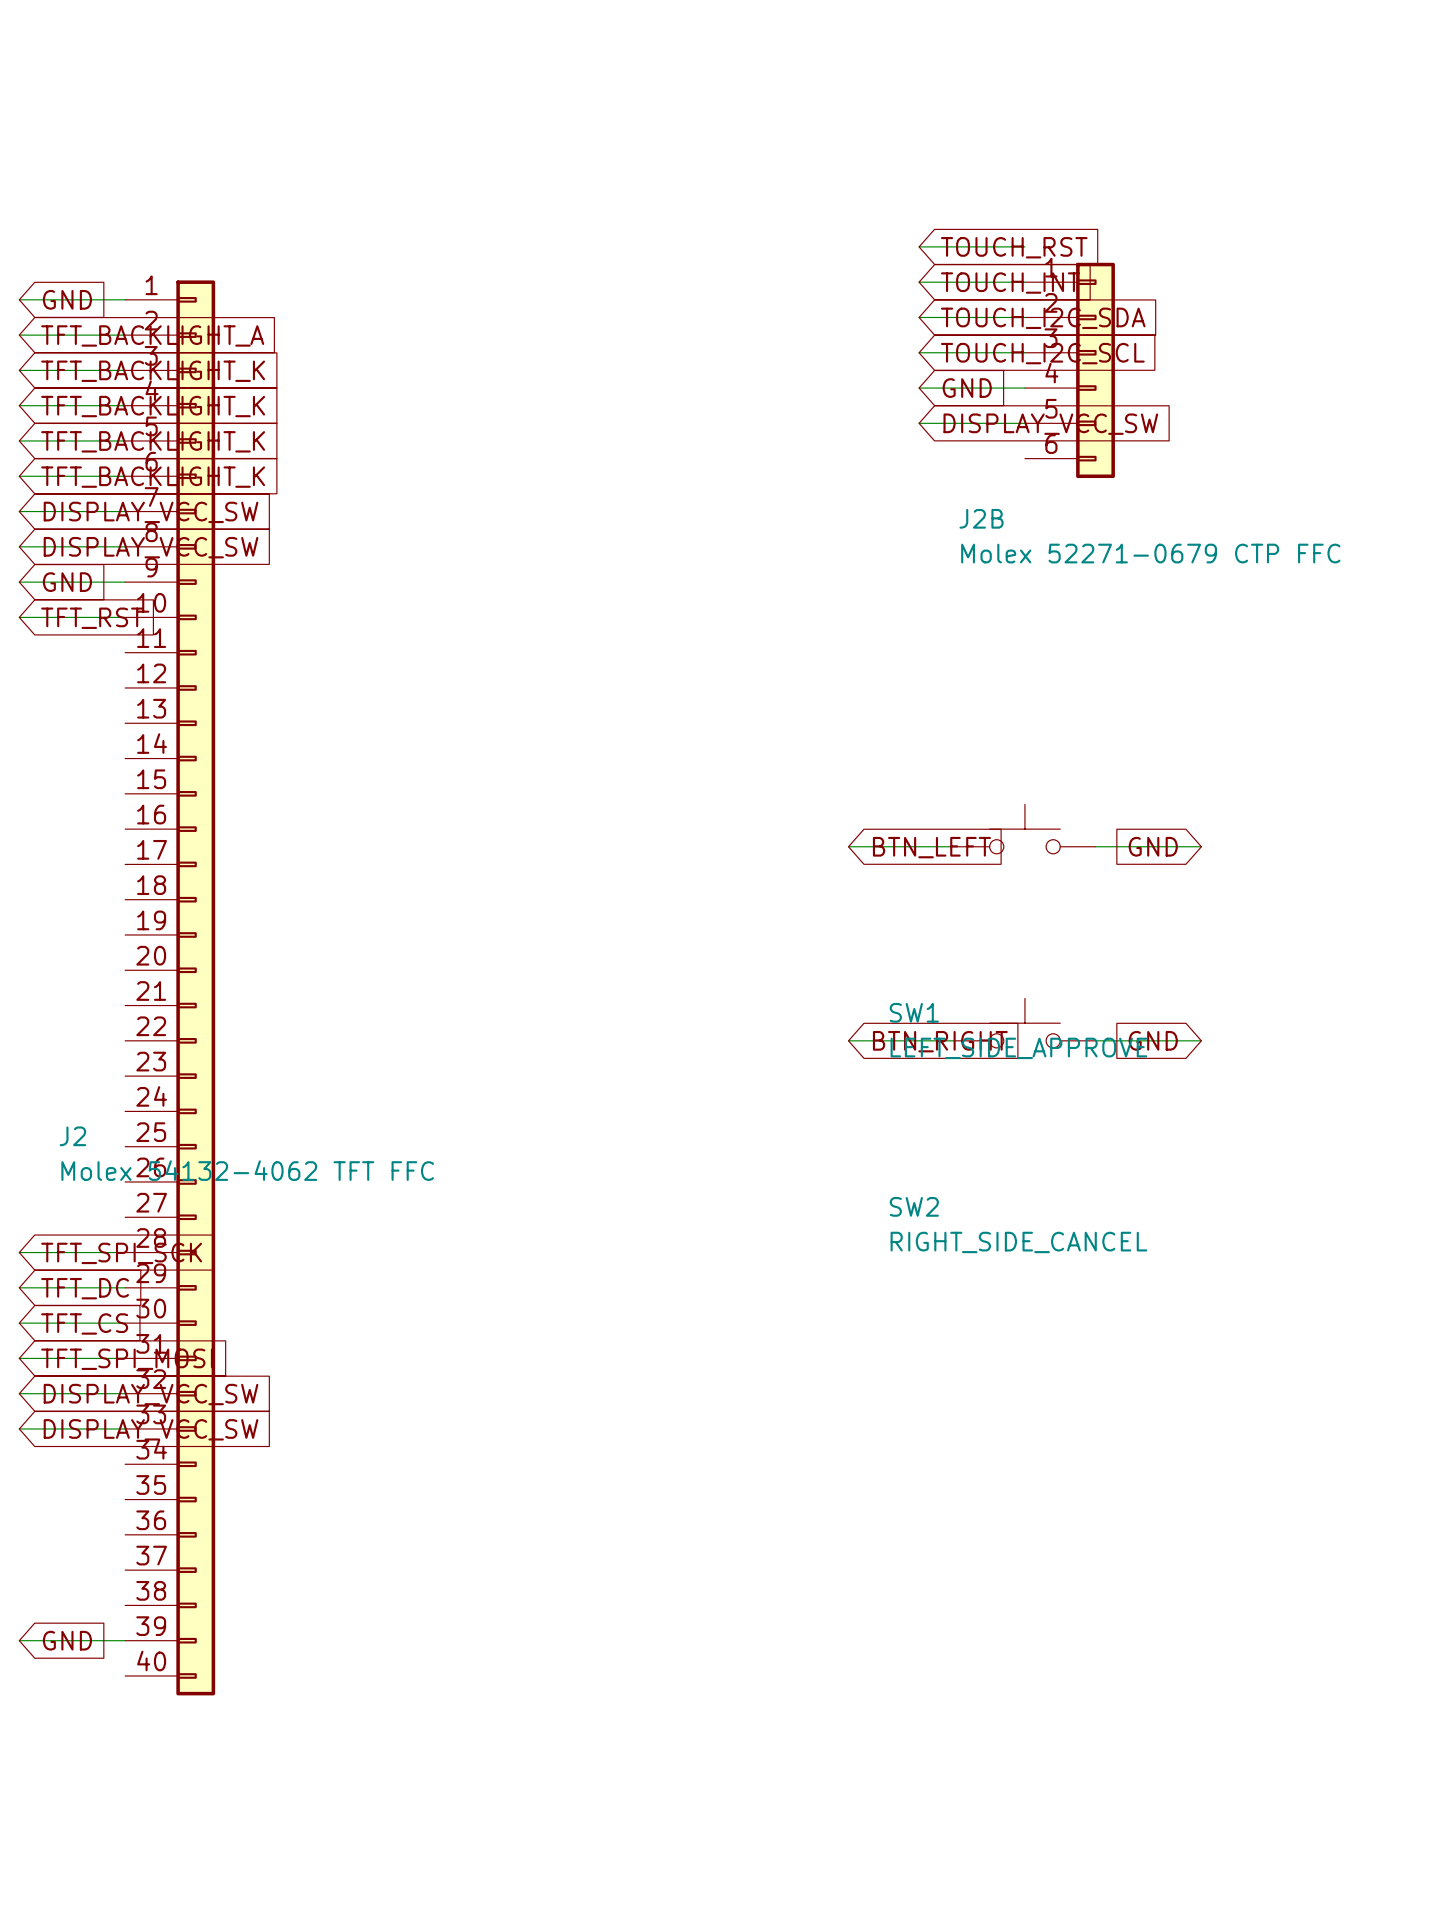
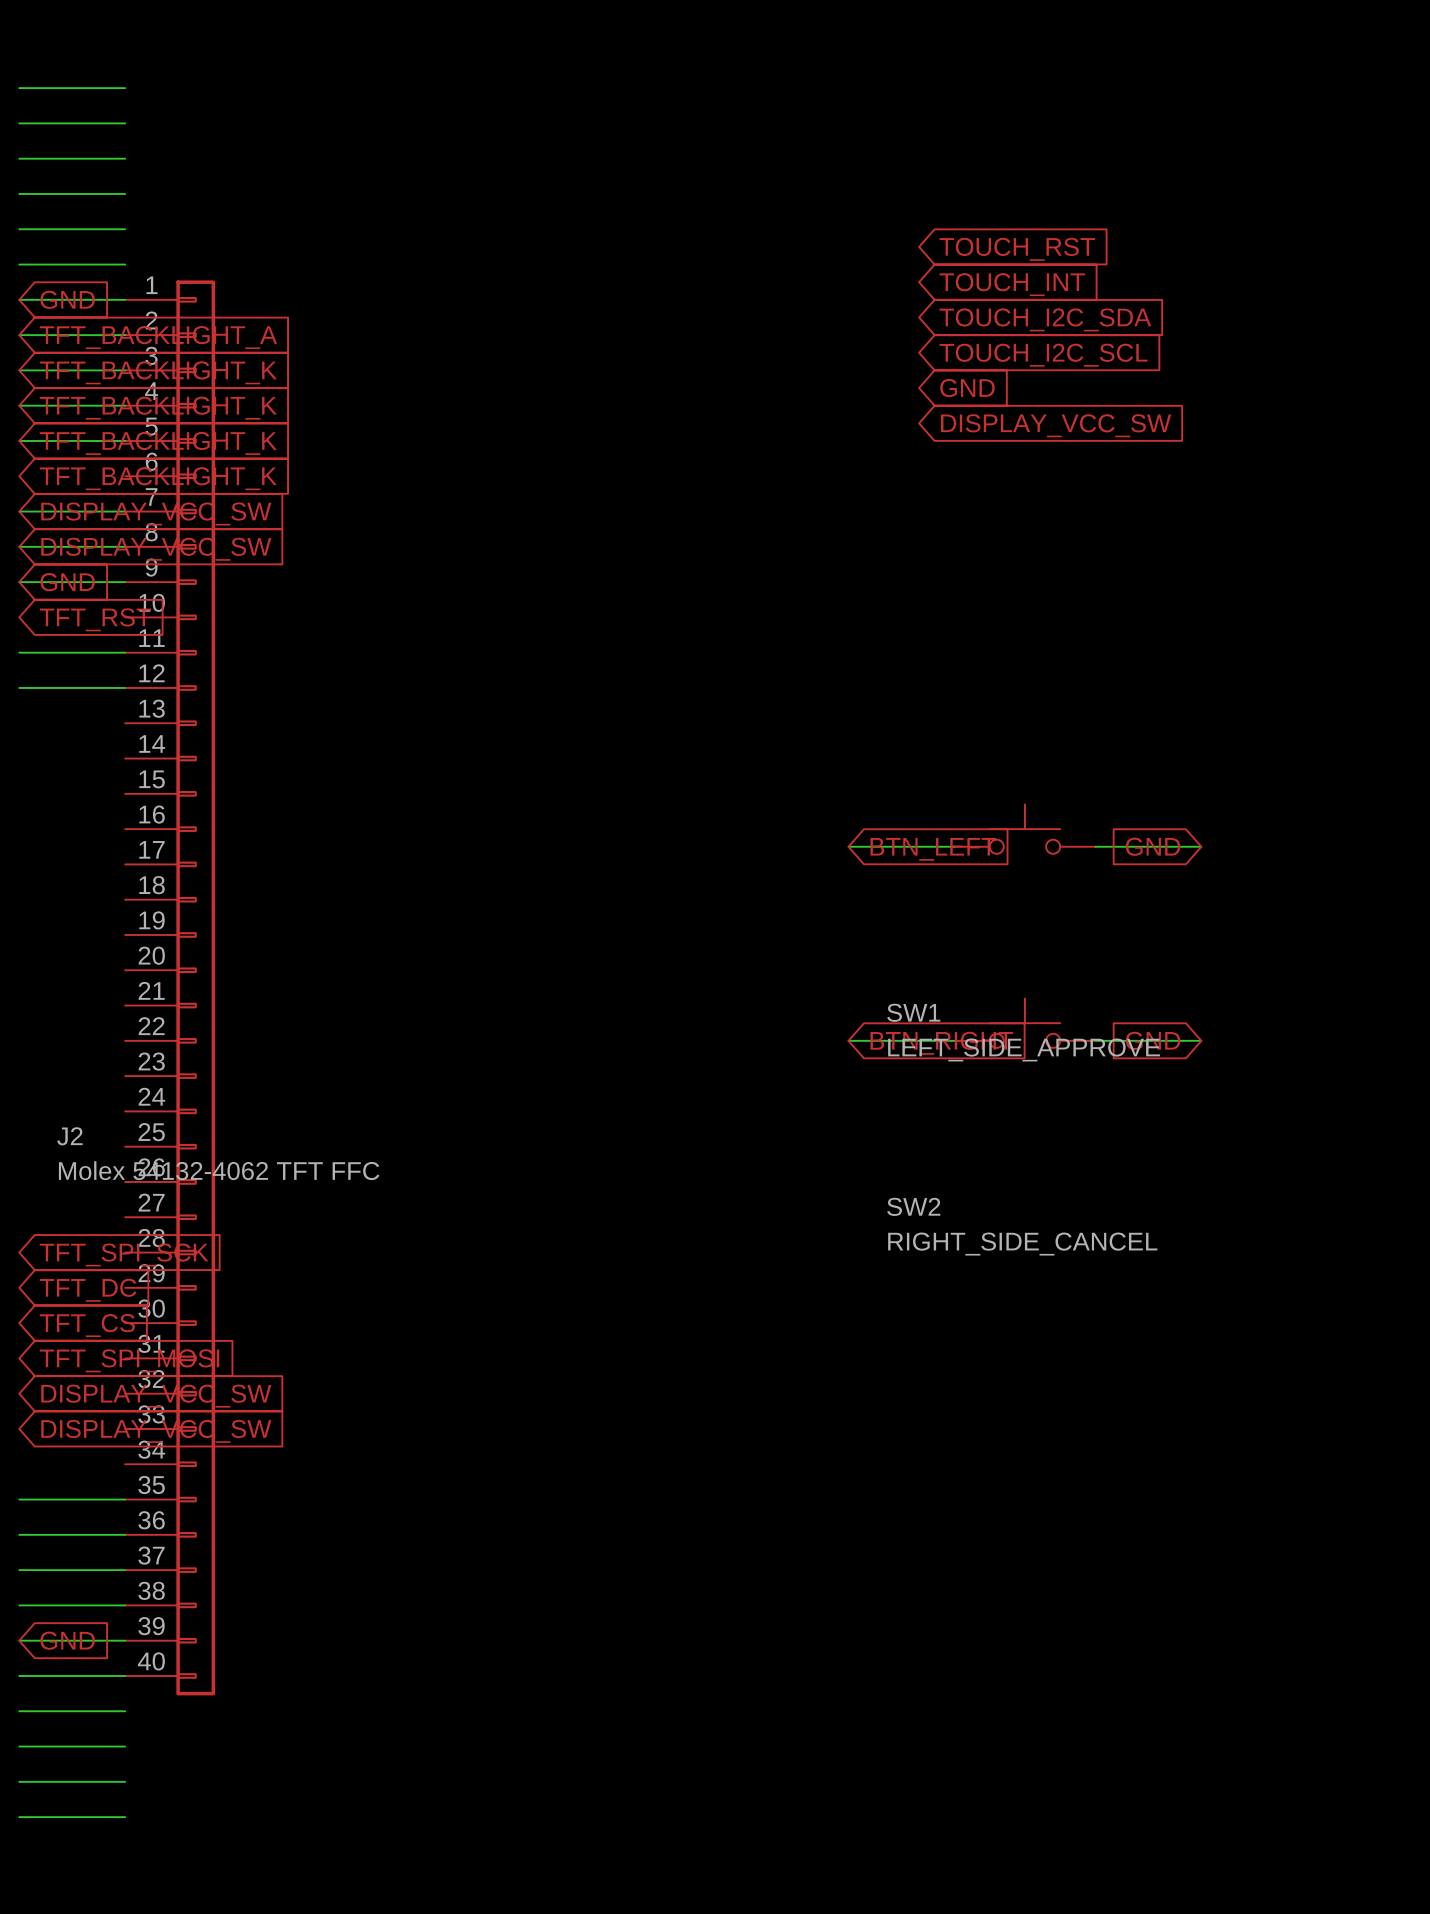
wire: none -> (19, 88) (125, 88)
wire: none -> (19, 123) (125, 123)
wire: none -> (19, 158) (125, 158)
wire: none -> (19, 193) (125, 193)
wire: none -> (19, 229) (125, 229)
wire: (919, 246) (1024, 246) -> none
wire: none -> (19, 264) (125, 264)
wire: (919, 282) (1024, 282) -> none
wire: (919, 317) (1024, 317) -> none
wire: (919, 352) (1024, 352) -> none
J2B: Molex 52271-0679 CTP FFC (1069, 370) -> none
wire: (919, 388) (1024, 388) -> none
wire: (919, 423) (1024, 423) -> none
wire: (19, 476) (125, 476) -> (19, 652) (125, 652)
wire: (19, 617) (125, 617) -> (19, 687) (125, 687)
wire: (19, 1252) (125, 1252) -> none
wire: (19, 1287) (125, 1287) -> none
wire: (19, 1323) (125, 1323) -> (19, 1499) (125, 1499)
wire: (19, 1358) (125, 1358) -> (19, 1534) (125, 1534)
wire: (19, 1393) (125, 1393) -> (19, 1570) (125, 1570)
wire: (19, 1428) (125, 1428) -> (19, 1605) (125, 1605)
wire: none -> (19, 1675) (125, 1675)
wire: none -> (19, 1711) (125, 1711)
wire: none -> (19, 1746) (125, 1746)
wire: none -> (19, 1781) (125, 1781)
wire: none -> (19, 1817) (125, 1817)

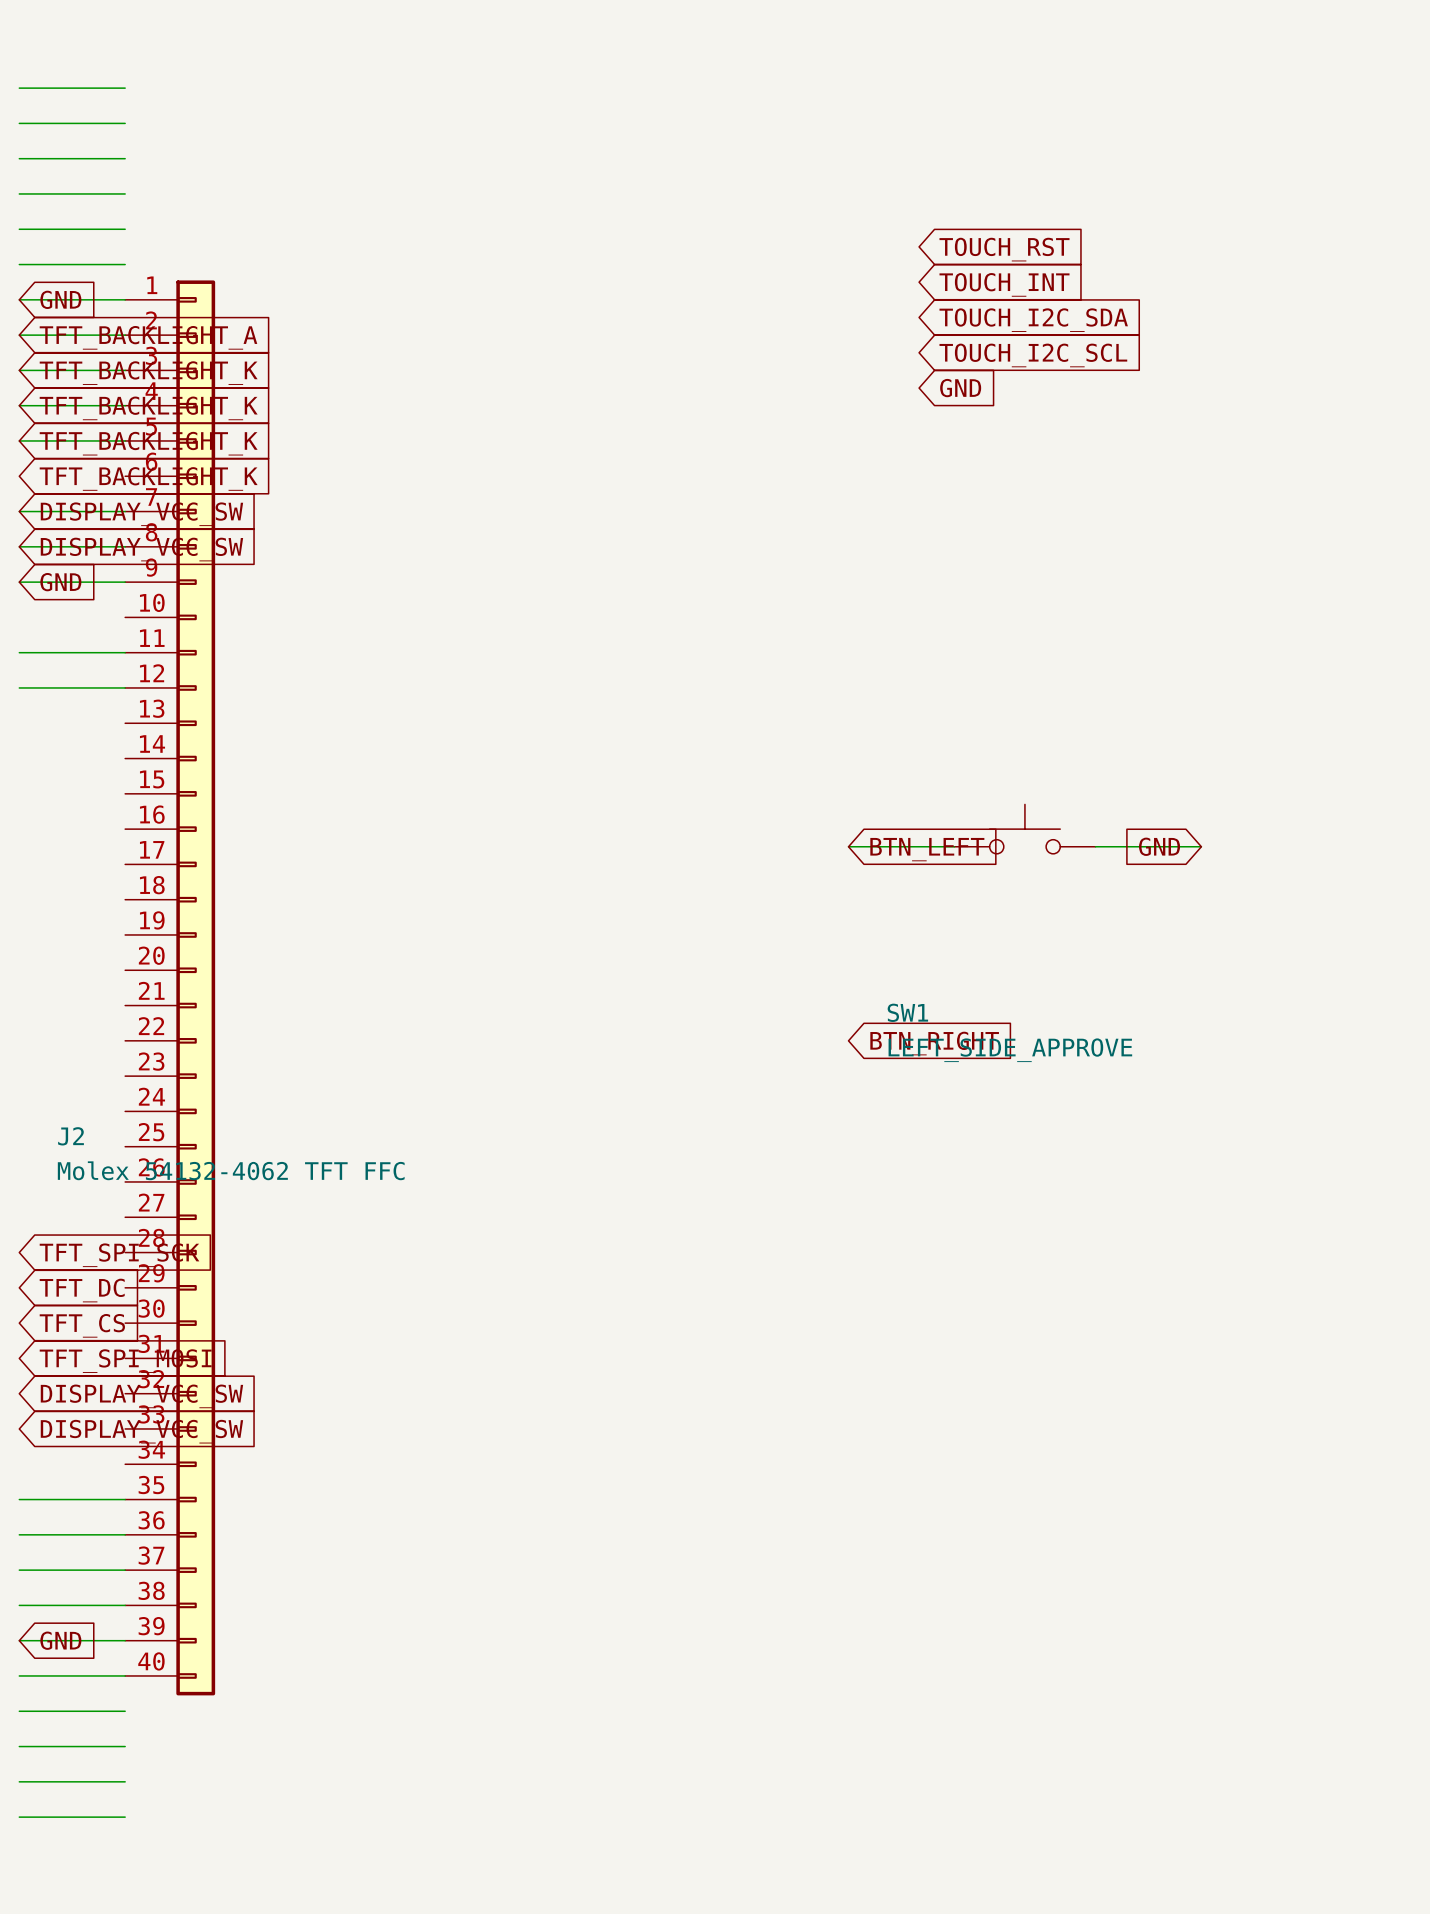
global label: DISPLAY_VCC_SW (1056, 425) -> none
global label: TFT_RST (95, 619) -> none
SW2: RIGHT_SIDE_CANCEL (1024, 1023) -> none
wire: (848, 1040) (954, 1040) -> none
wire: (1095, 1040) (1201, 1040) -> none
global label: GND (1153, 1040) -> none

